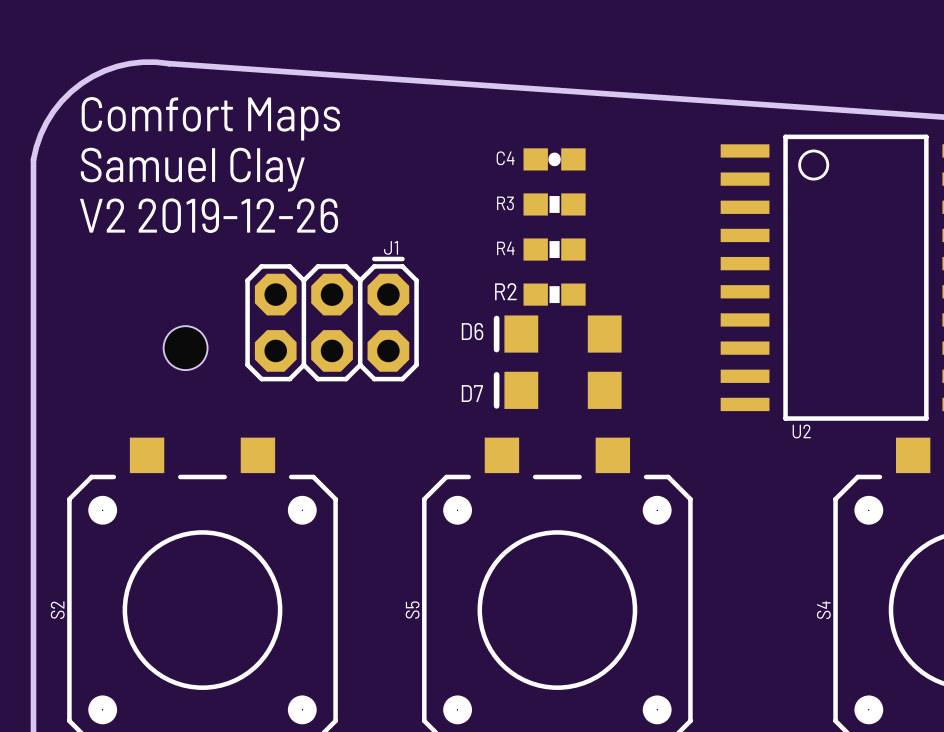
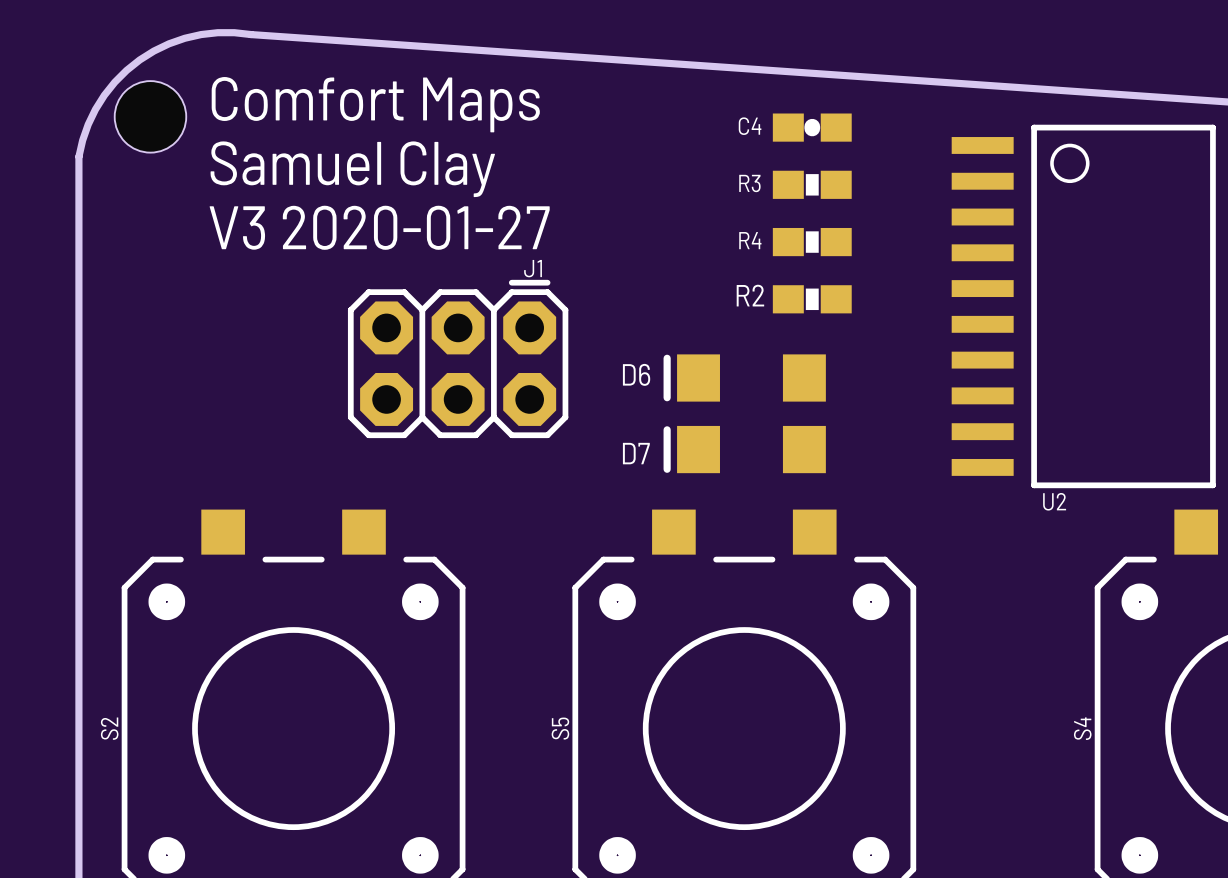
text position: Comfort Maps (210, 118) -> Comfort Maps (375, 104)
hole: none -> (150, 116)
C4 position: (554, 159) -> (812, 127)
text position: Samuel Clay (192, 169) -> Samuel Clay (352, 169)
R3 position: (554, 204) -> (812, 184)
text: V2 2019-12-26 (209, 215) -> none
text: none -> V3 2020-01-27 (379, 227)
R4 position: (554, 249) -> (812, 242)
R2 position: (554, 294) -> (812, 299)
hole: (185, 348) -> none

